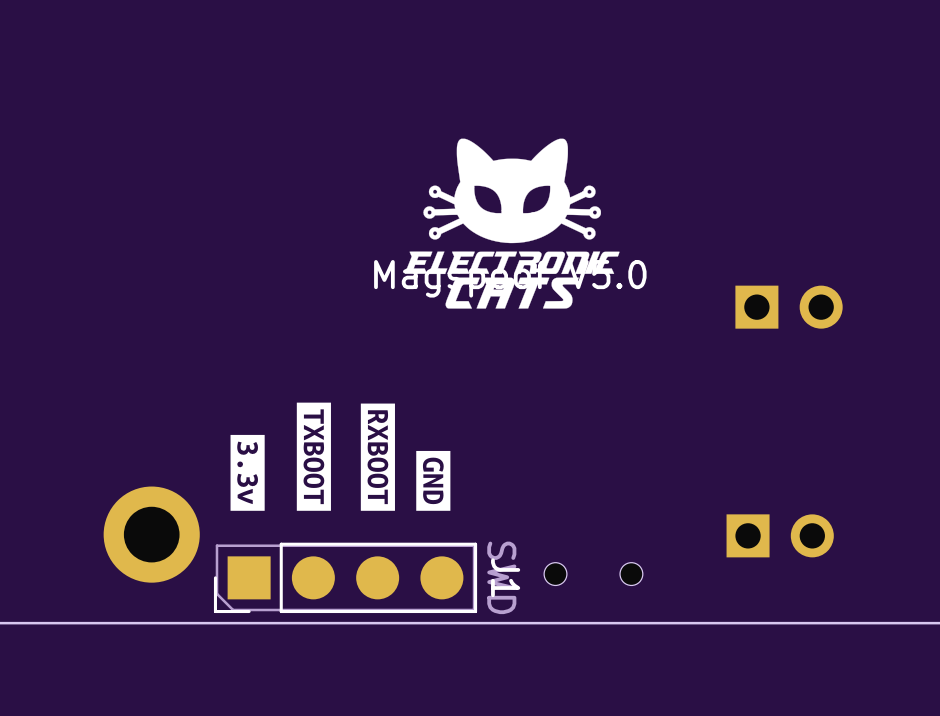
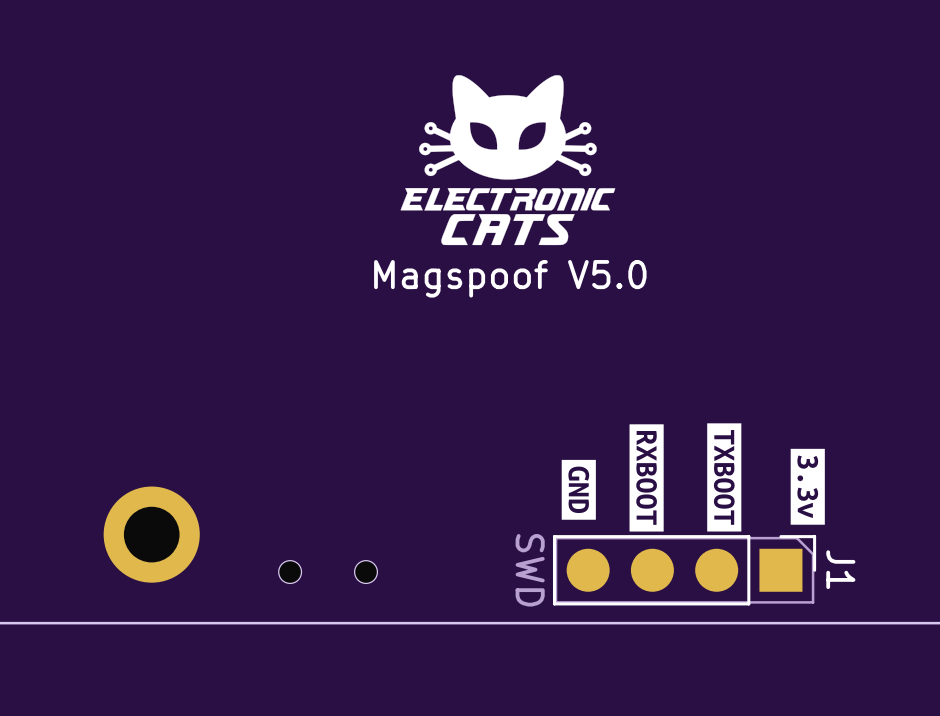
drawing position: (512, 223) -> (507, 160)
part: (789, 307) -> none
drawing position: (313, 456) -> (724, 477)
drawing position: (377, 457) -> (646, 477)
drawing position: (247, 472) -> (807, 486)
drawing position: (433, 480) -> (578, 489)
part: (780, 535) -> none
part position: (593, 574) -> (328, 572)
J1 rotation: 0° (345, 577) -> 180° (684, 570)
J1 position: (345, 577) -> (684, 570)

